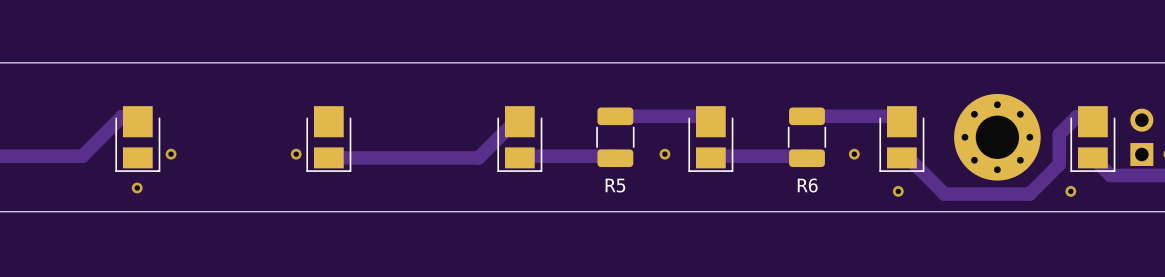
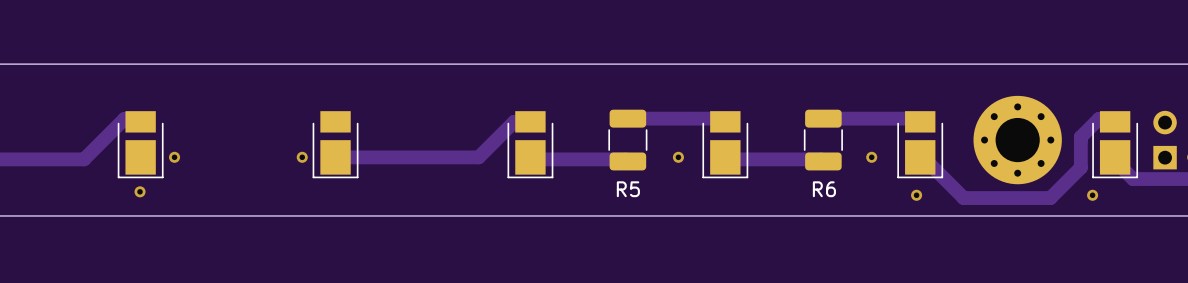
part footprint: [115, 106, 161, 172] -> [117, 111, 164, 179]
part footprint: [306, 106, 352, 172] -> [312, 111, 359, 179]
part footprint: [497, 106, 543, 172] -> [507, 111, 554, 179]
part footprint: [688, 106, 734, 172] -> [702, 111, 749, 179]
part footprint: [879, 106, 925, 172] -> [897, 111, 944, 179]
part footprint: [1070, 106, 1116, 172] -> [1092, 111, 1139, 179]
track: (519, 116) (478, 157) (335, 157) -> none
track: none -> (530, 121) (514, 121) (478, 157) (335, 157)

